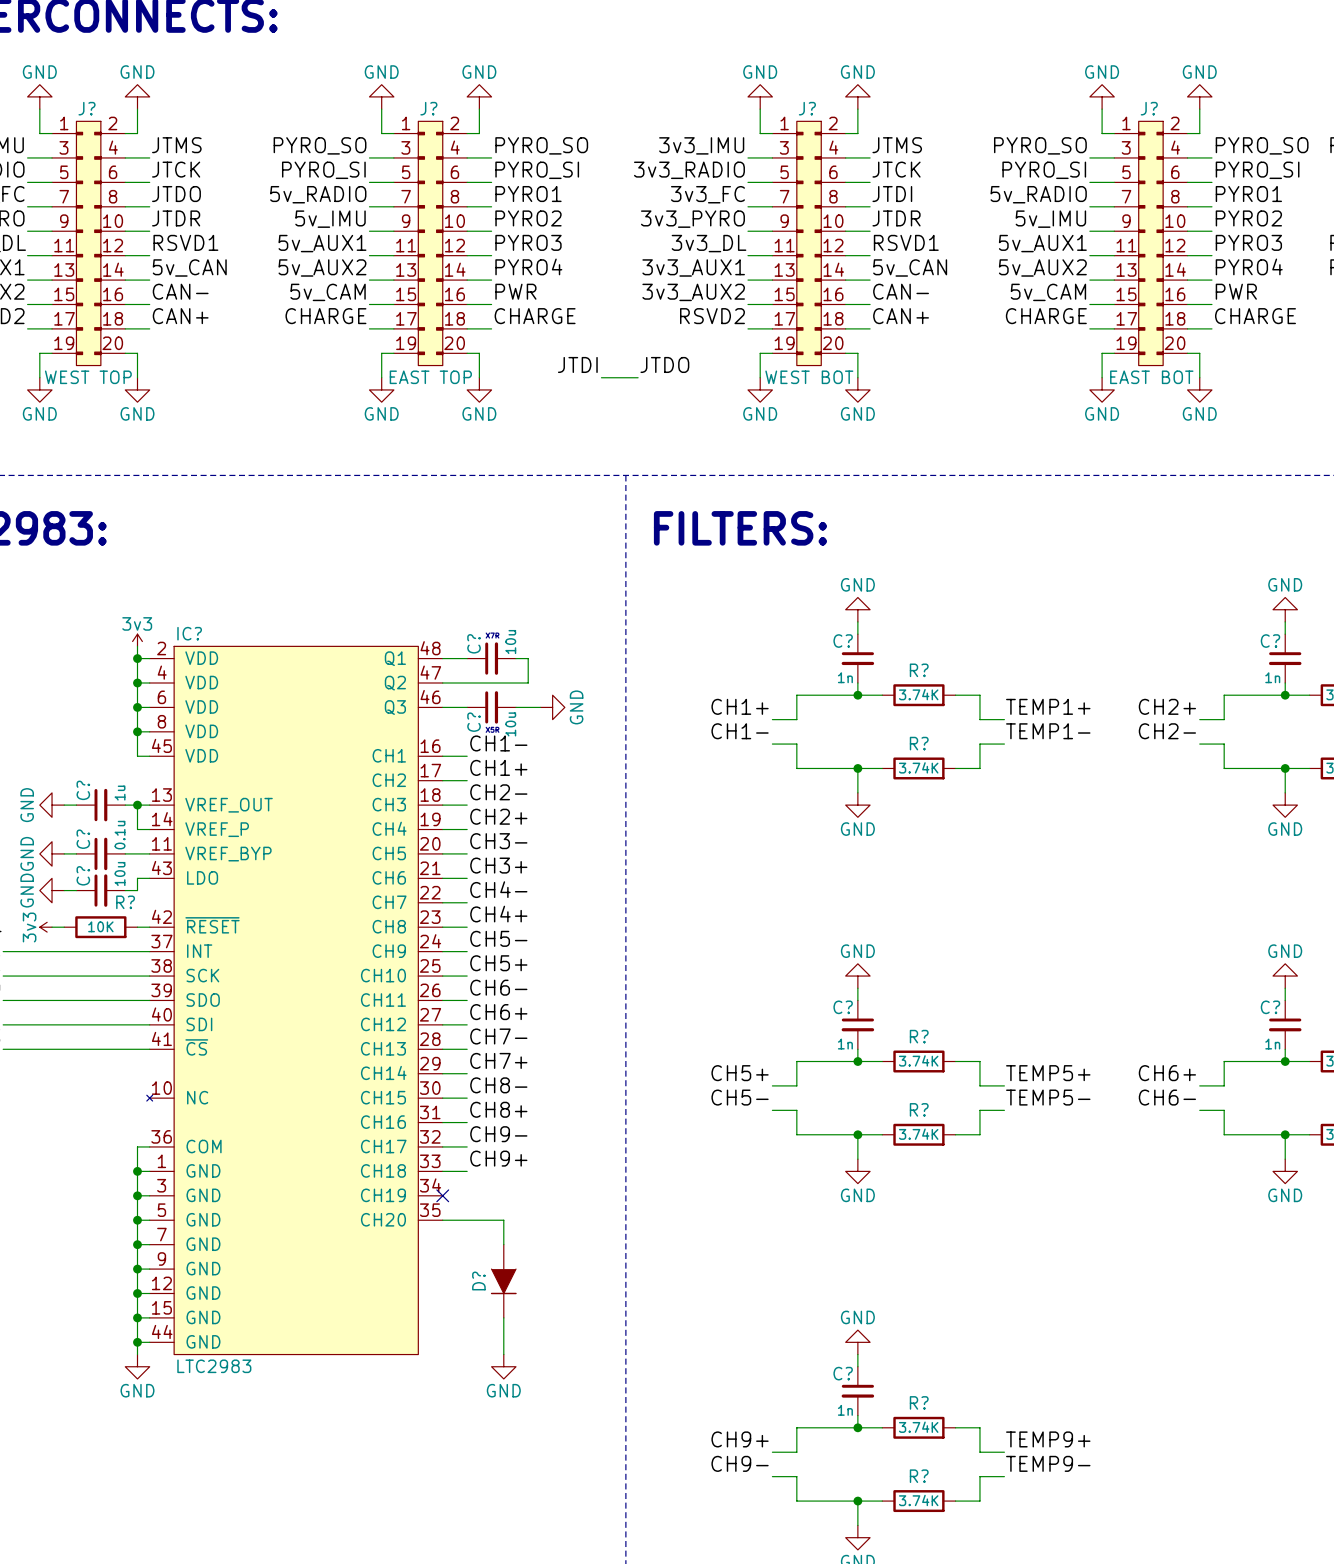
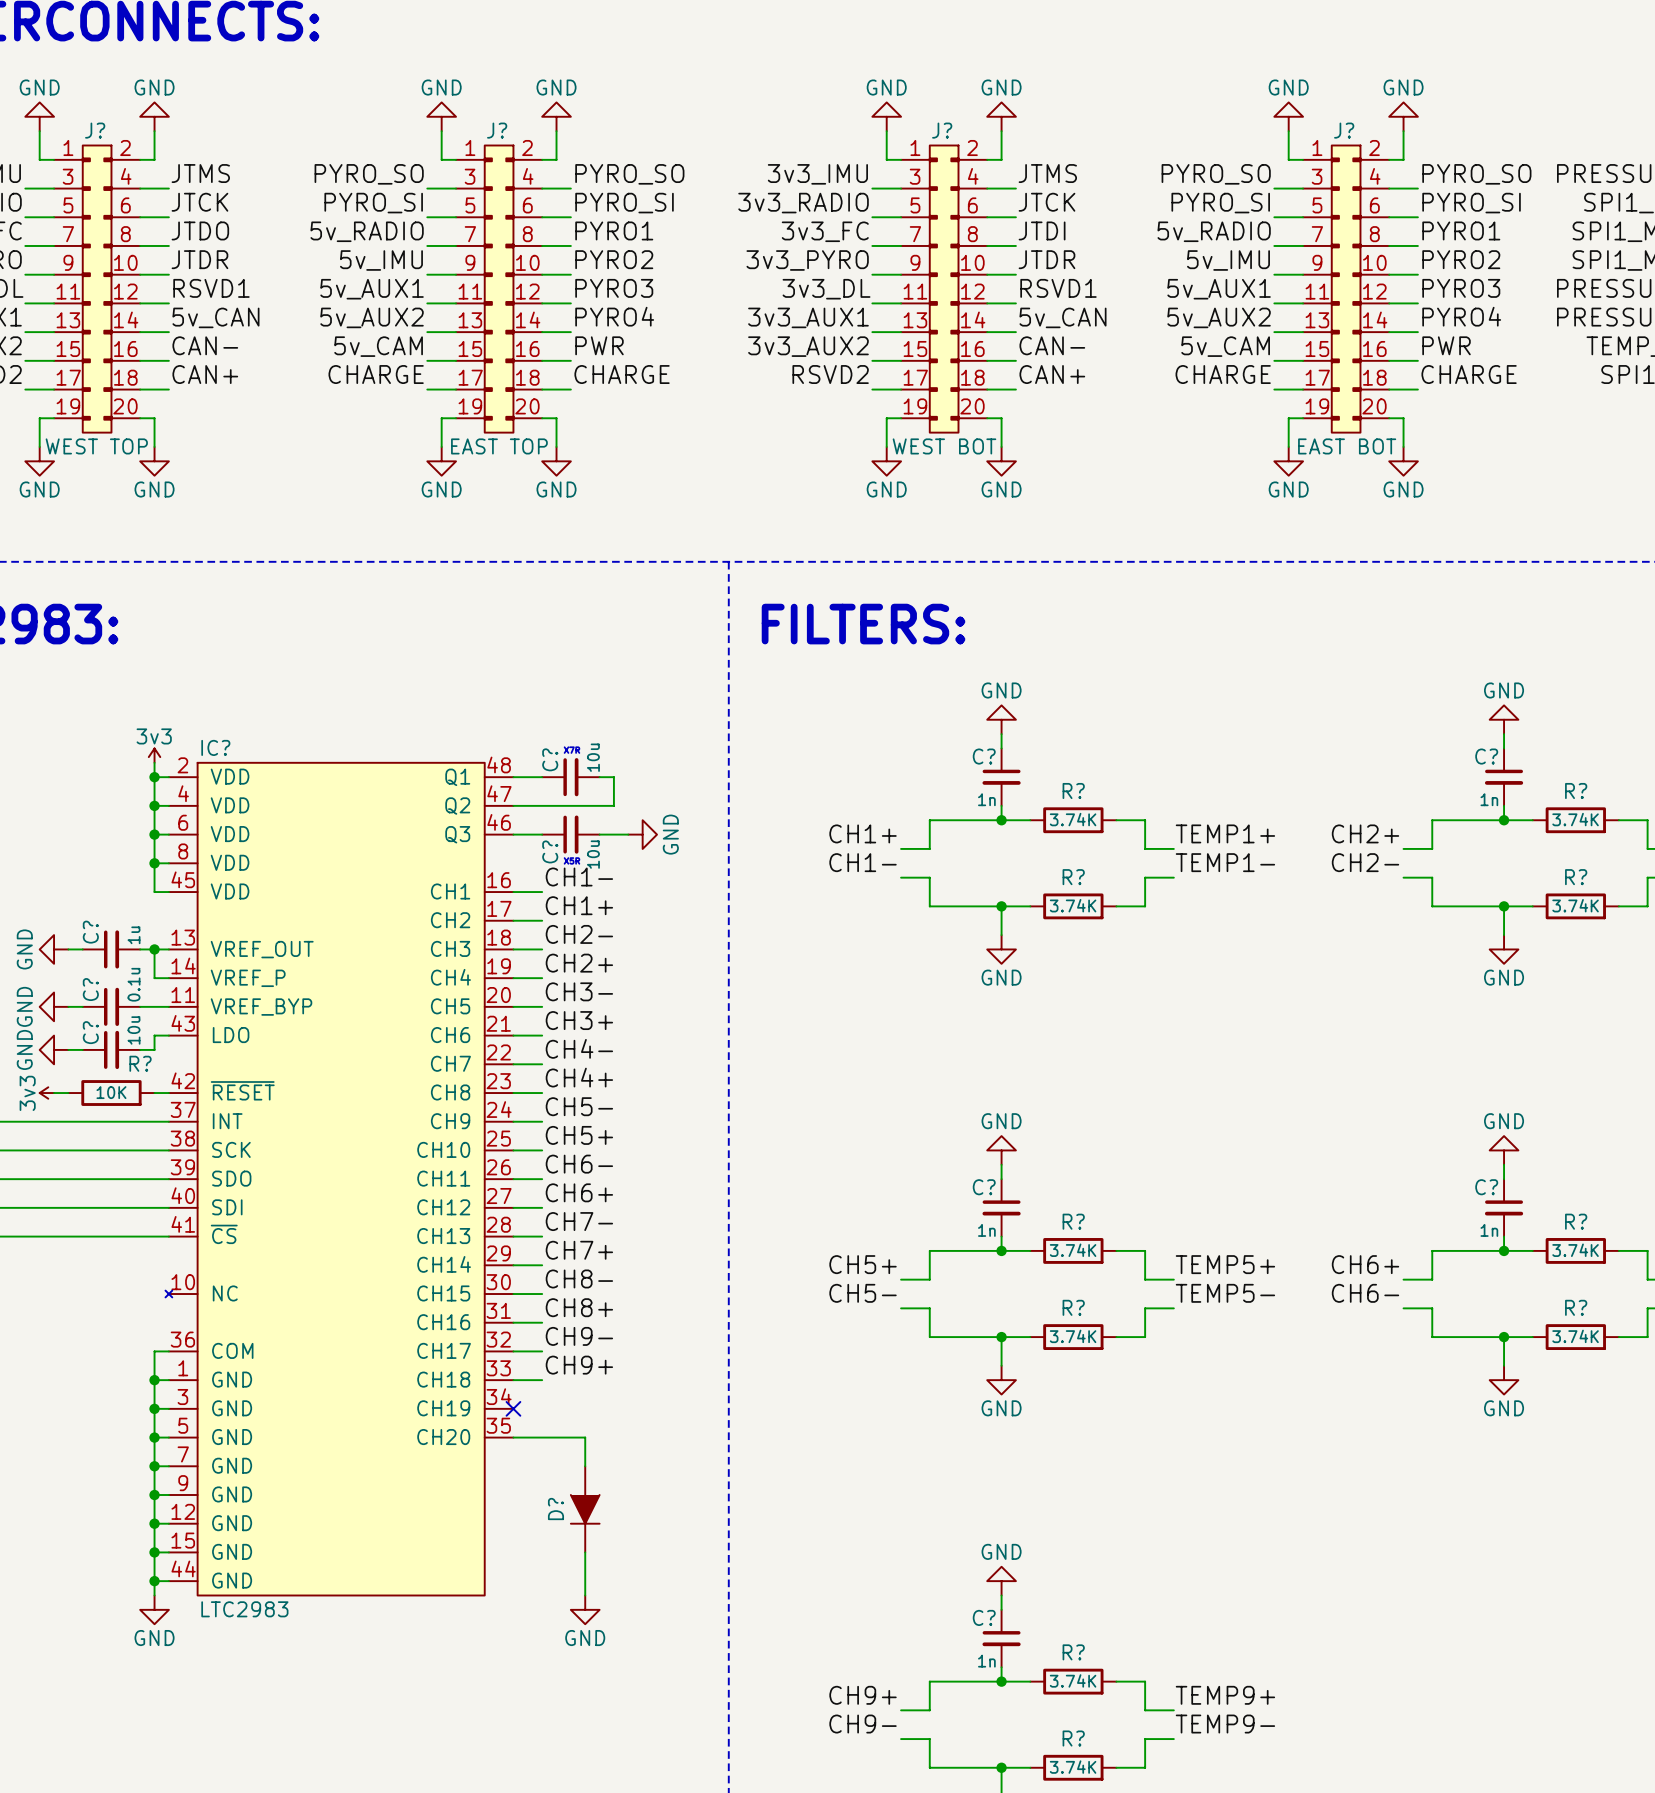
label: JTDI (577, 364) -> none
label: JTDO (664, 364) -> none
wire: (601, 377) (638, 377) -> none

